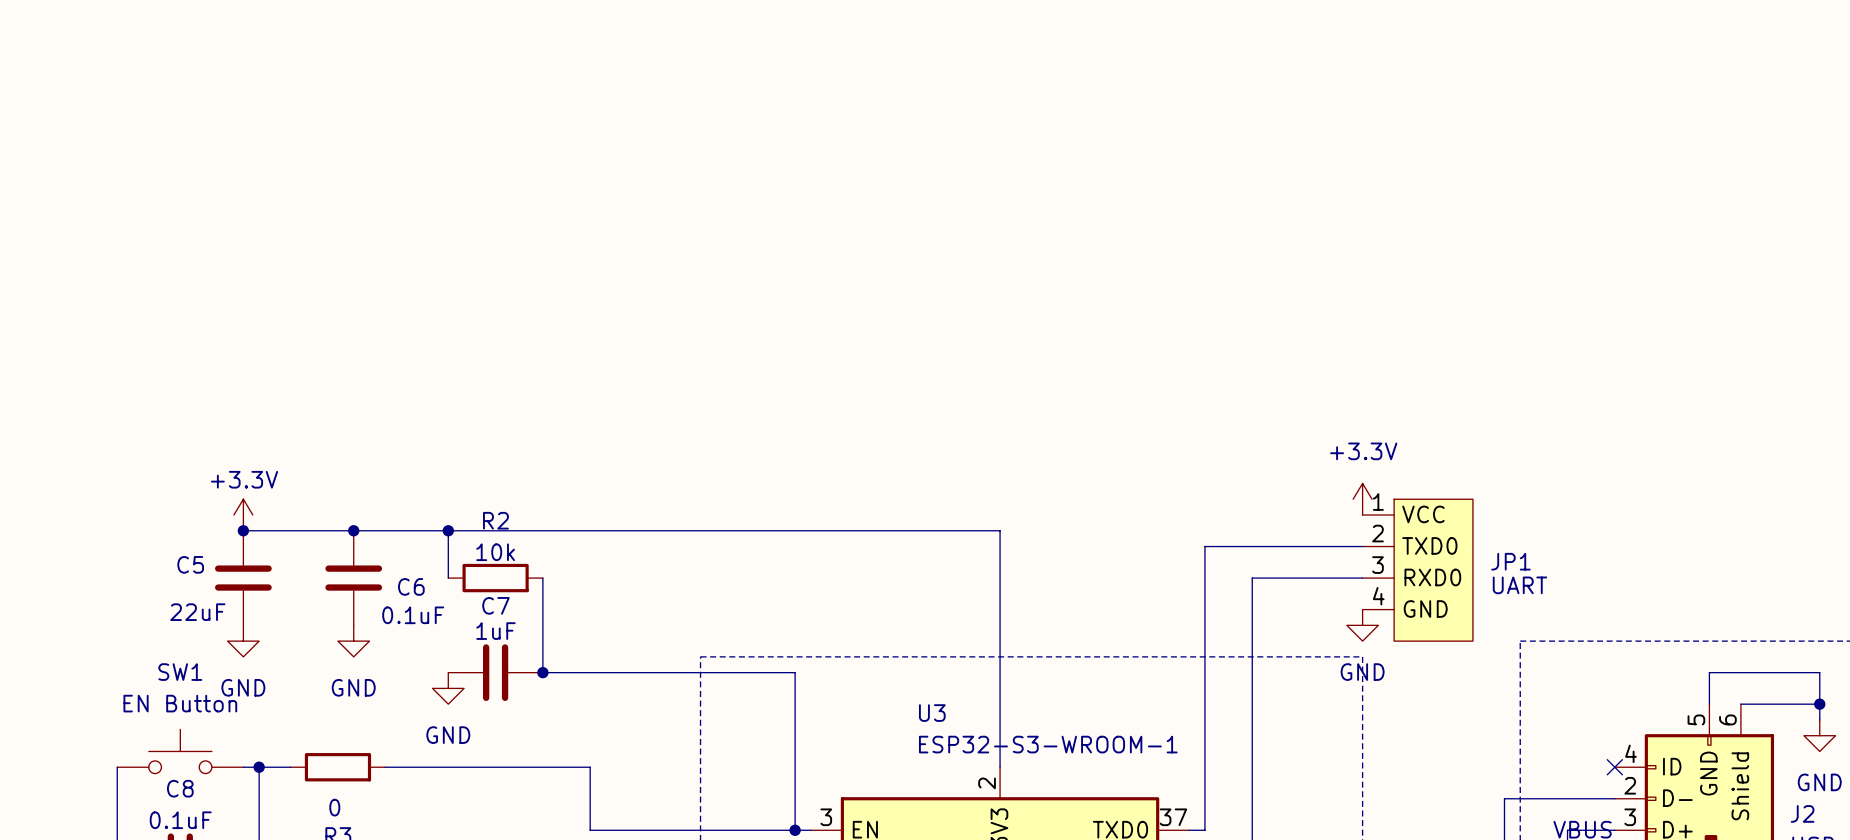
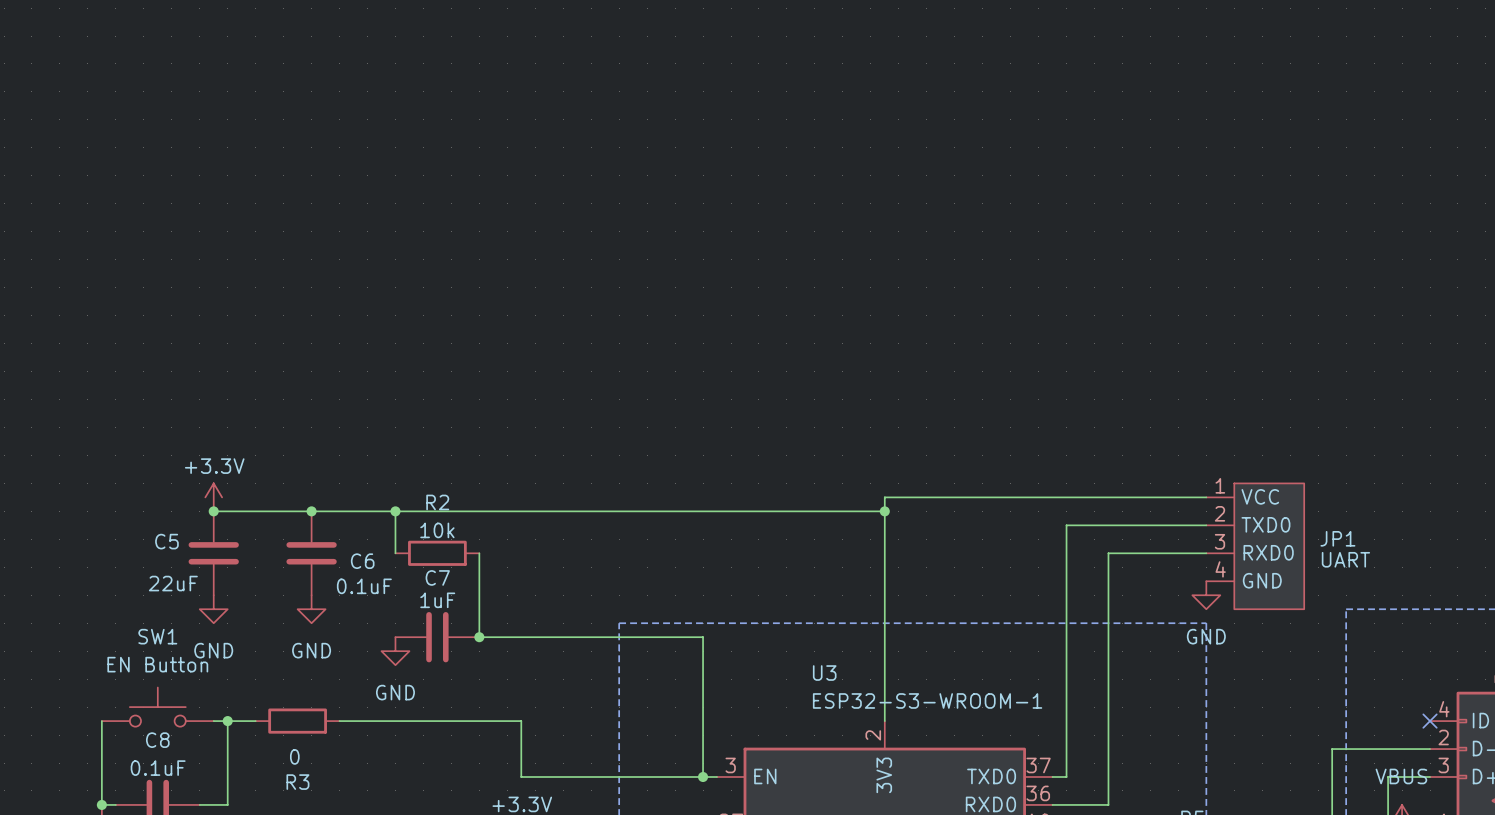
power symbol: +3.3V (1362, 499) -> none
wire: none -> (1206, 497) (884, 497) (884, 511)
junction: none -> (884, 511)

